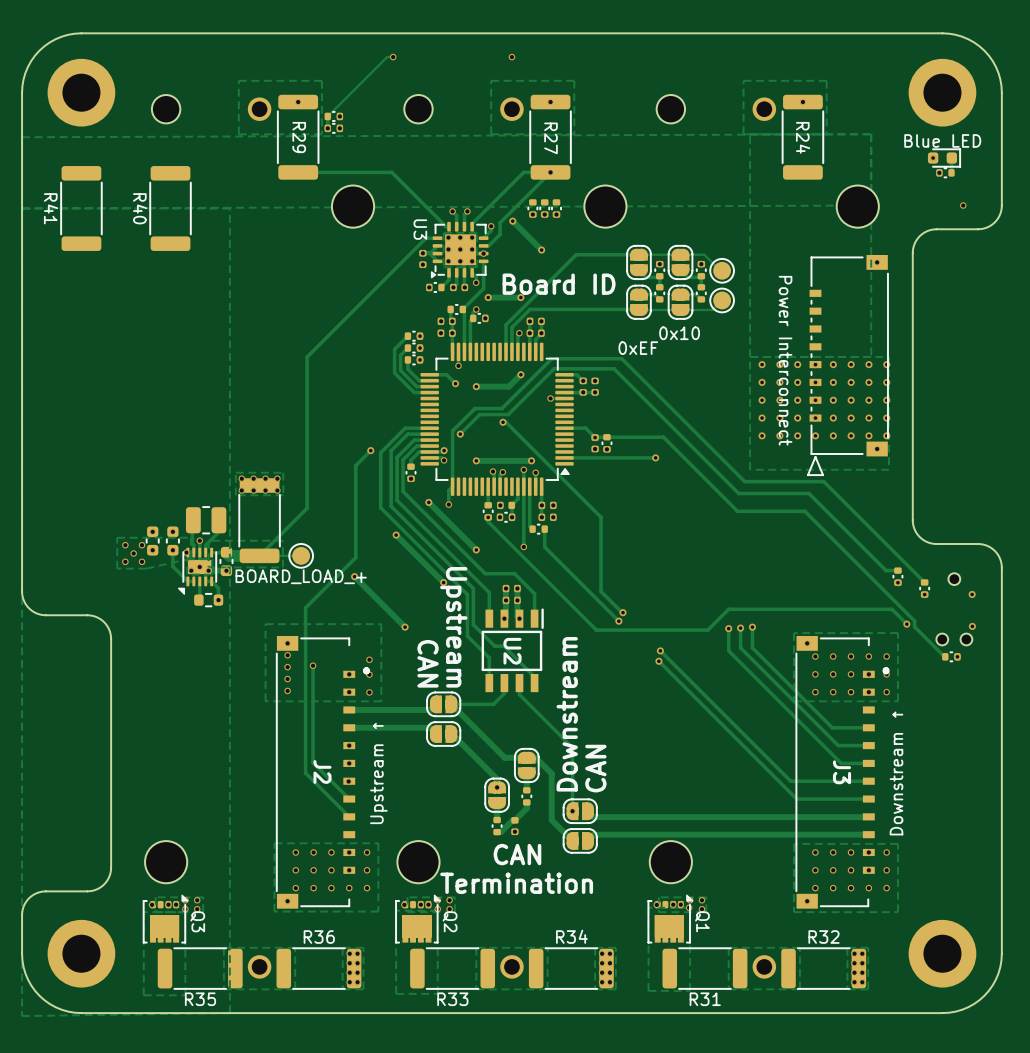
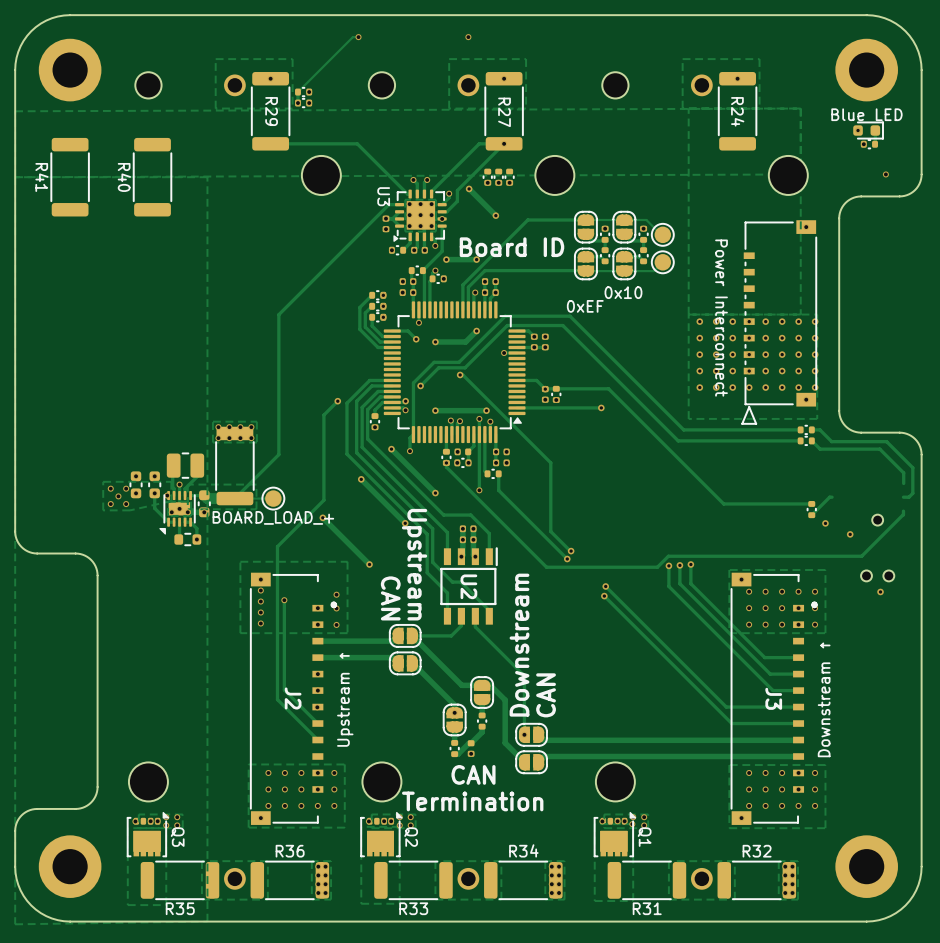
part footprint: [21, 33, 1003, 1014] -> [14, 14, 922, 922]
track: (823, 481) (924, 582) -> (756, 429) (800, 429)
part: none -> (806, 429)
track: none -> (811, 429) (819, 429) (831, 441) (886, 441) (912, 467) (912, 493) (908, 497) (903, 497)
track: (808, 493) (886, 570) (897, 570) -> (743, 440) (800, 440)
part: none -> (806, 440)
track: none -> (811, 440) (820, 449) (879, 449) (903, 472) (903, 483)
track: (737, 511) (804, 511) (914, 620) (914, 626) (945, 656) -> (677, 457) (723, 503) (811, 503)
track: none -> (832, 497) (829, 497) (811, 515)
part position: (897, 576) -> (811, 509)
part: (924, 588) -> none
via: (972, 594) -> none
track: (906, 624) (892, 609) (728, 609) (707, 630) -> (903, 515) (903, 511) (903, 514) (861, 556) (668, 556) (657, 567) (649, 567)
via: (906, 624) -> none
via: (972, 626) -> none
part: (951, 656) -> none

